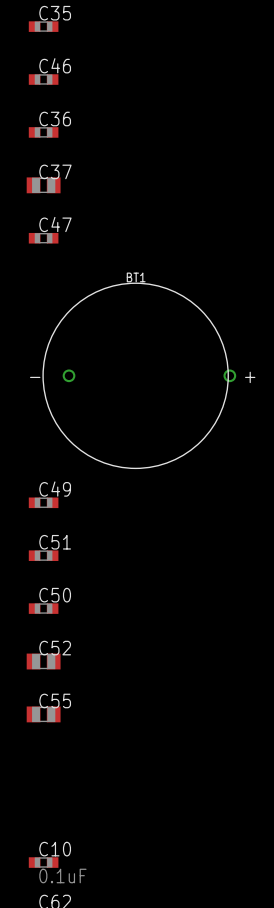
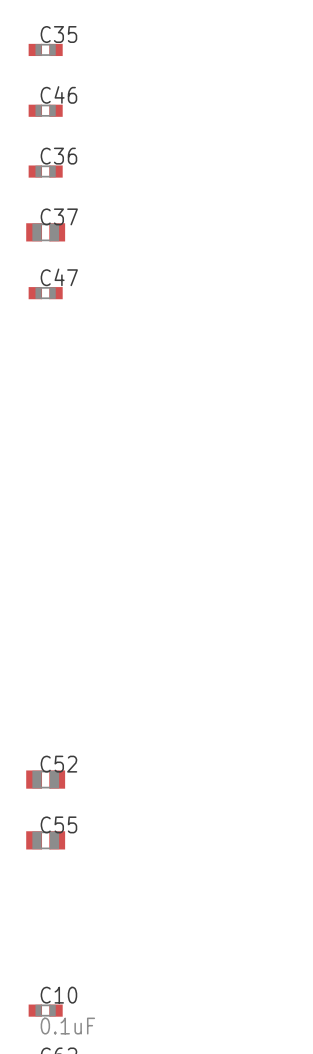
BT1: (139, 375) -> none
C49: (43, 502) -> none
C51: (43, 555) -> none
C50: (43, 608) -> none

